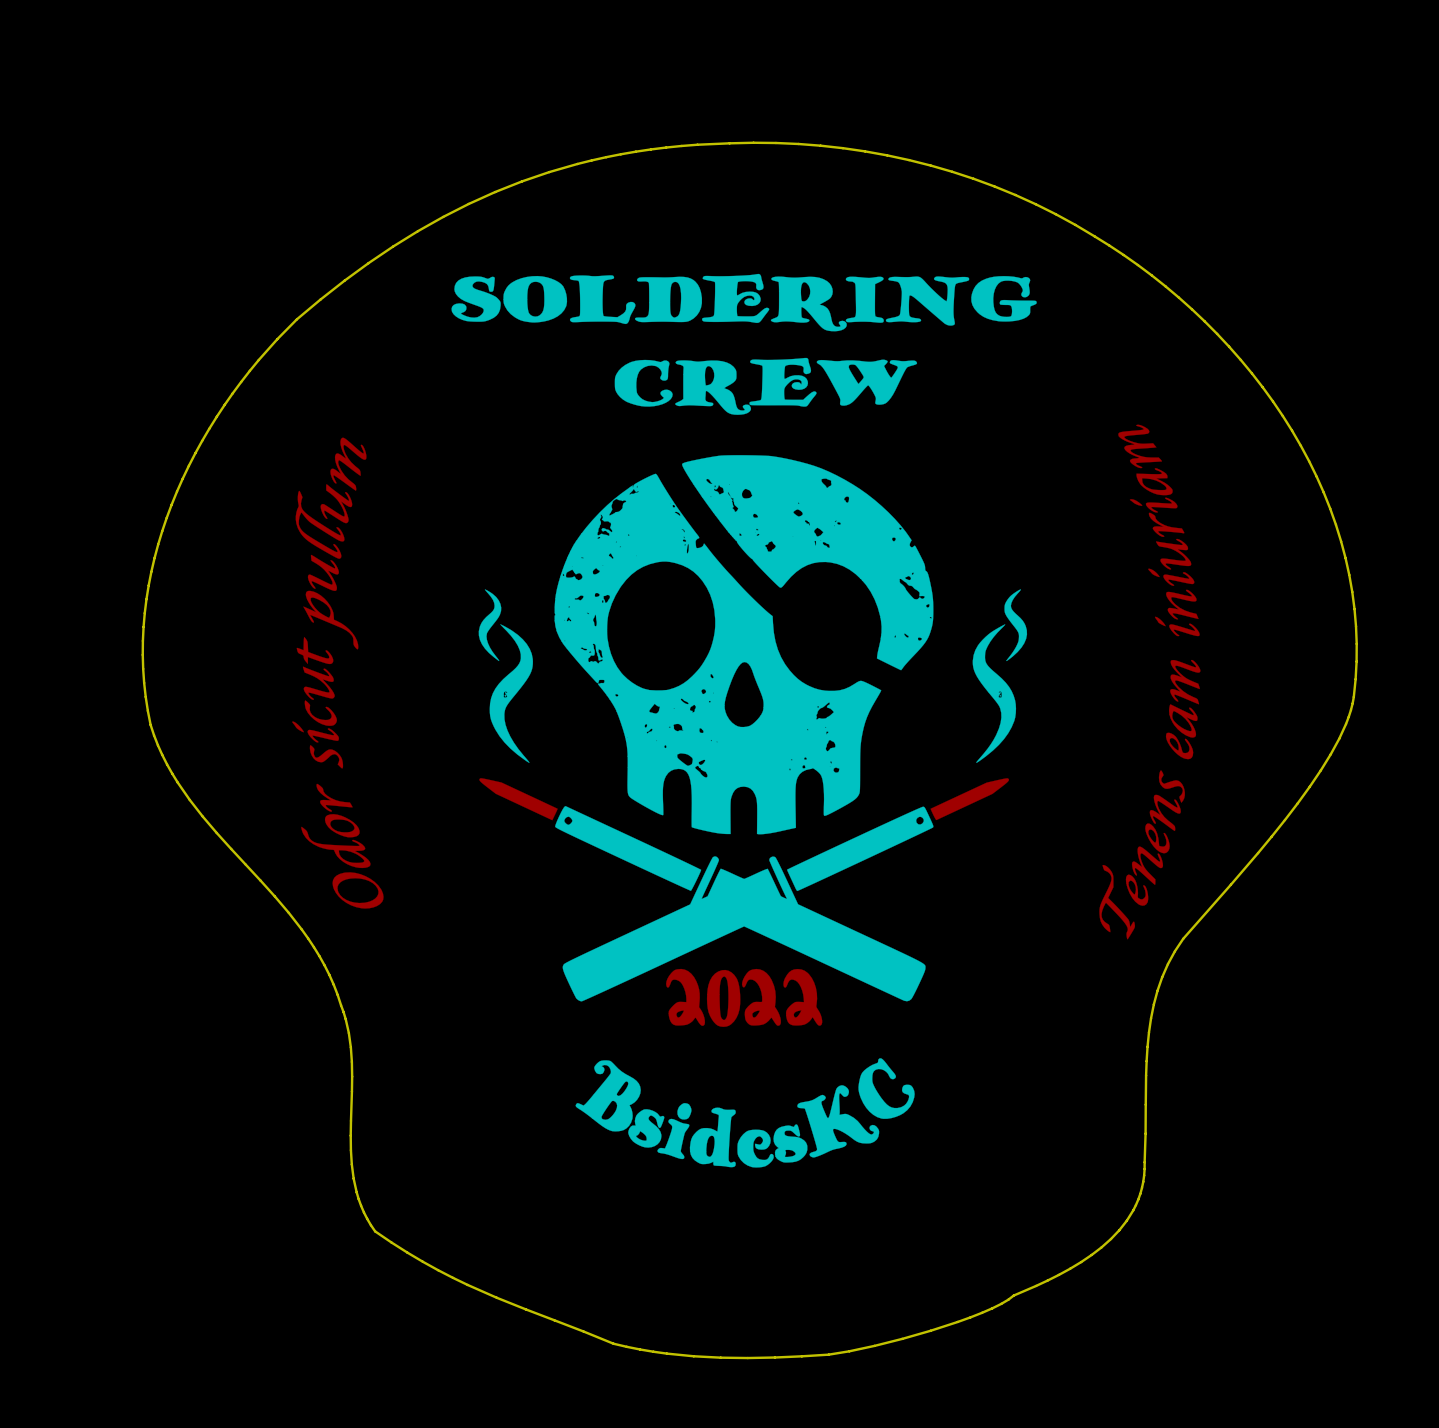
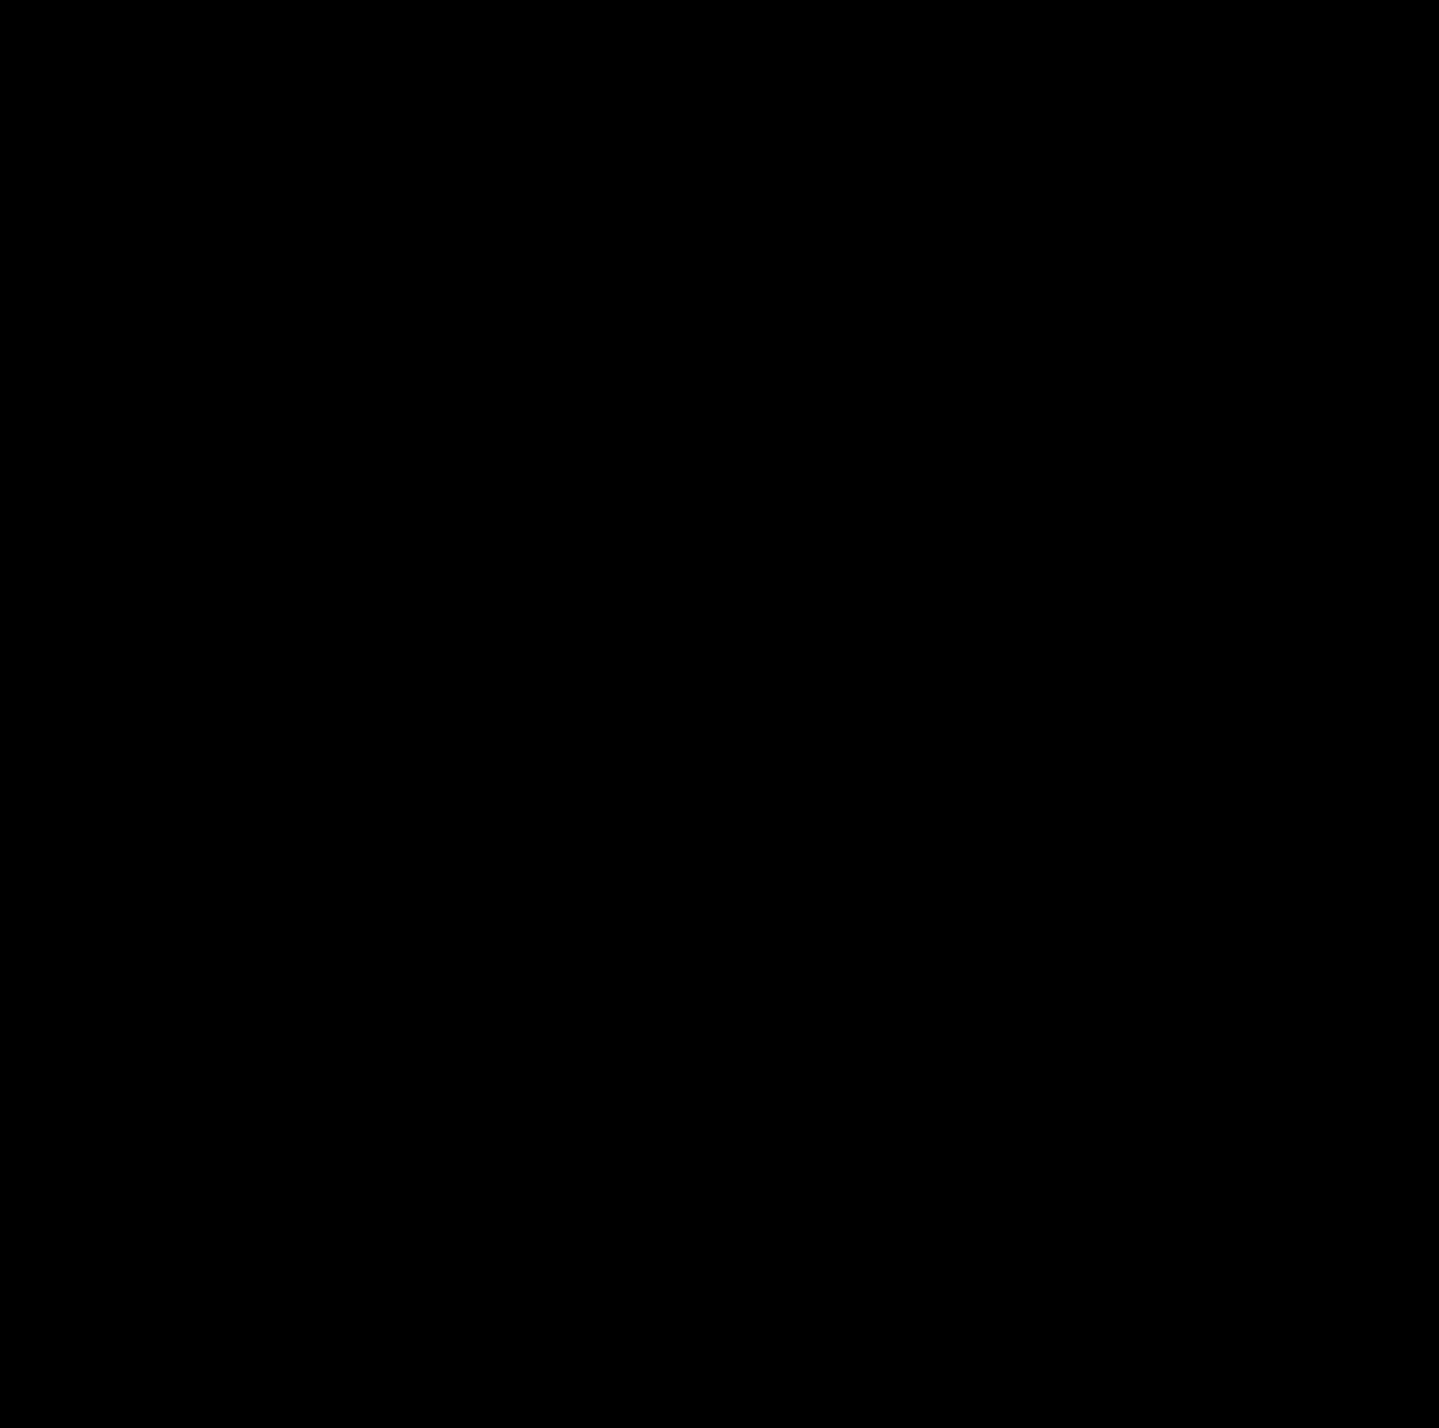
board edge: (753, 142) (697, 144) (635, 151) (577, 163) (521, 181) (468, 203) (417, 231) (368, 263) (320, 299) (296, 319) (249, 370) (216, 416) (195, 453) (171, 504) (158, 544) (146, 599) (142, 640) (144, 682) (147, 710) (154, 735) (167, 764) (202, 816) (274, 896) (301, 929) (319, 956) (333, 984) (345, 1019) (350, 1047) (350, 1150) (353, 1178) (361, 1205) (375, 1231) (422, 1261) (467, 1284) (613, 1343) (666, 1353) (720, 1357) (828, 1354) (874, 1345) (930, 1330) (982, 1312) (1058, 1274) (1091, 1254) (1119, 1230) (1135, 1205) (1143, 1181) (1147, 1046) (1153, 1004) (1162, 977) (1183, 938) (1284, 820) (1330, 754) (1350, 710) (1356, 661) (1356, 626) (1349, 574) (1335, 524) (1316, 476) (1292, 430) (1262, 387) (1229, 346) (1178, 297) (1123, 255) (1075, 224) (1035, 204) (973, 178) (930, 165) (865, 151) (820, 145) (753, 142) -> none
drawing: [292, 273, 1201, 1168] -> none

